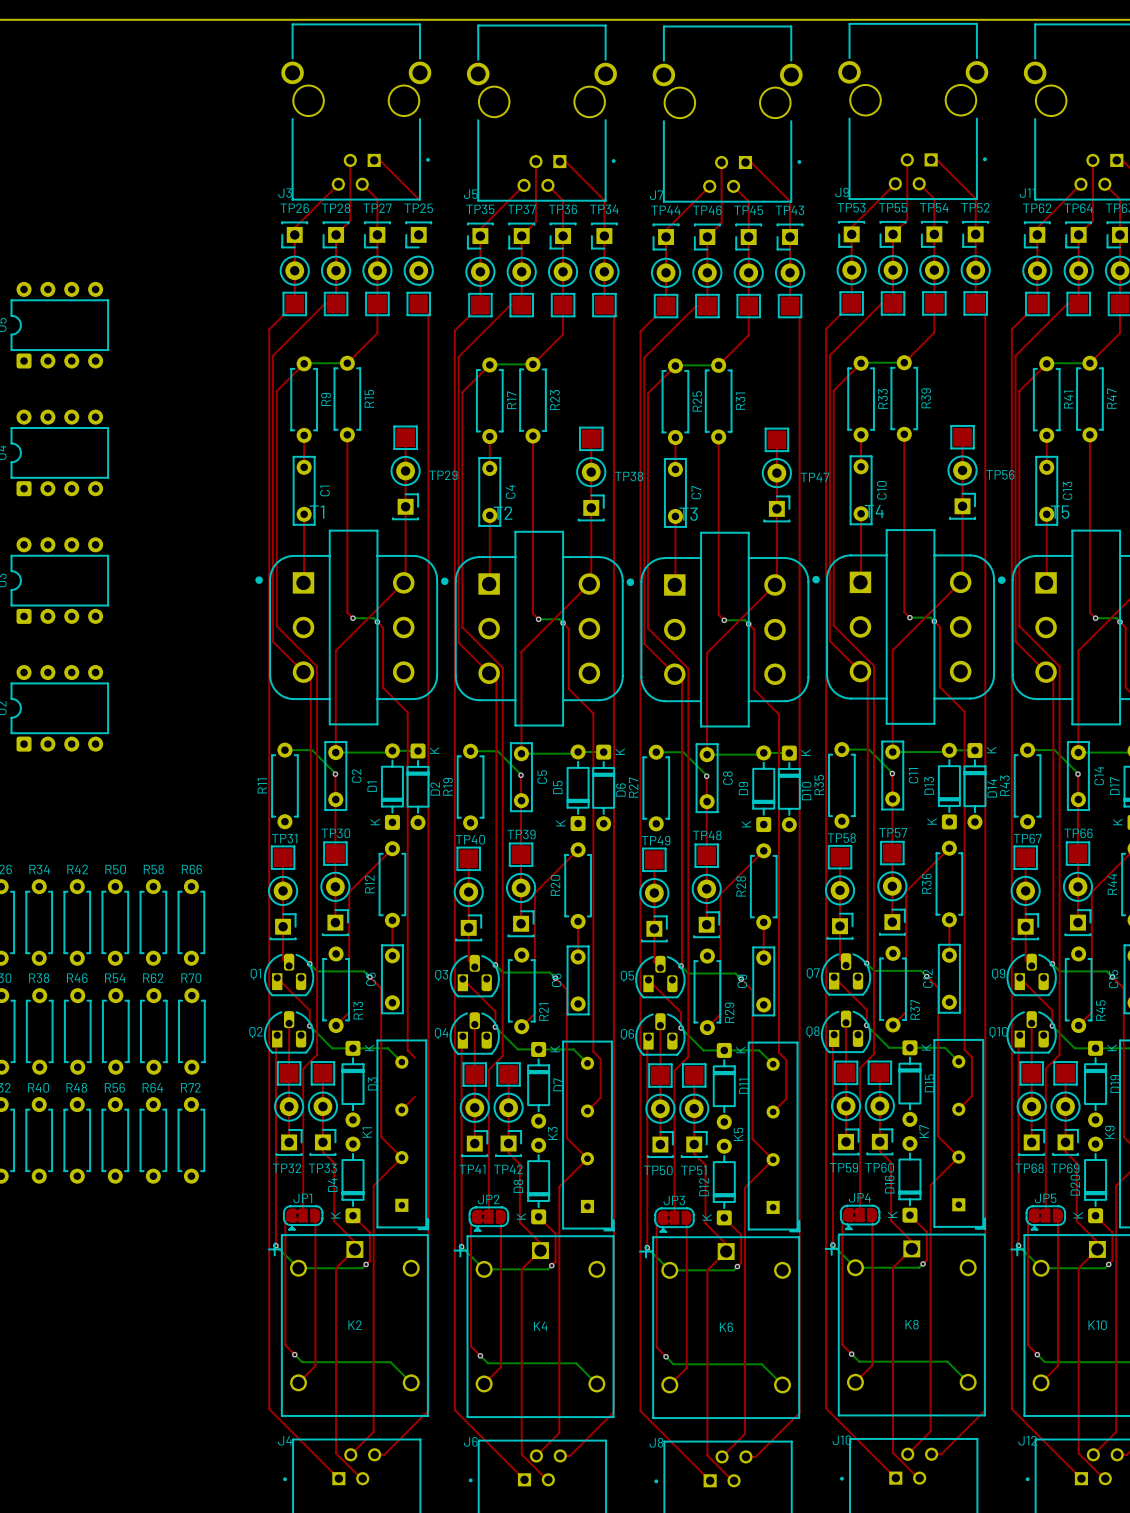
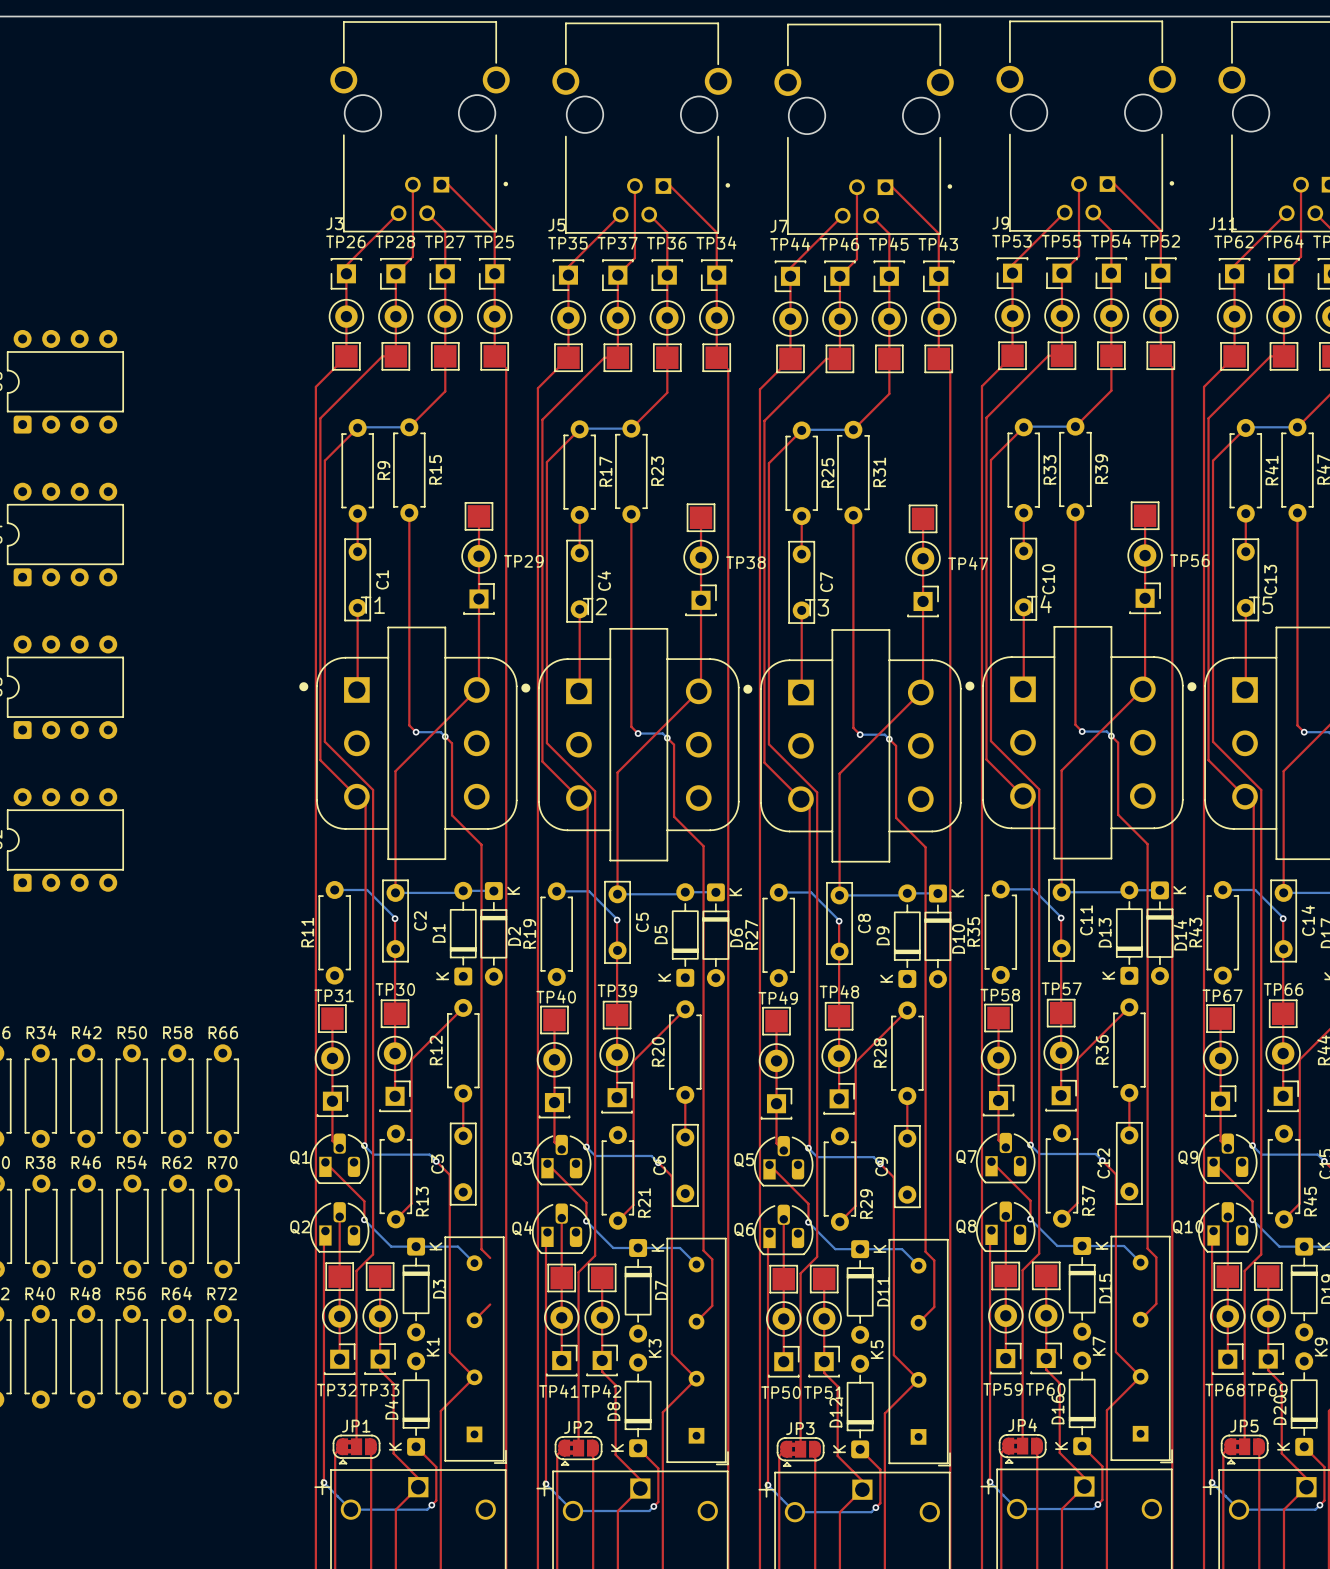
top track: none -> (494, 231) (494, 356)

